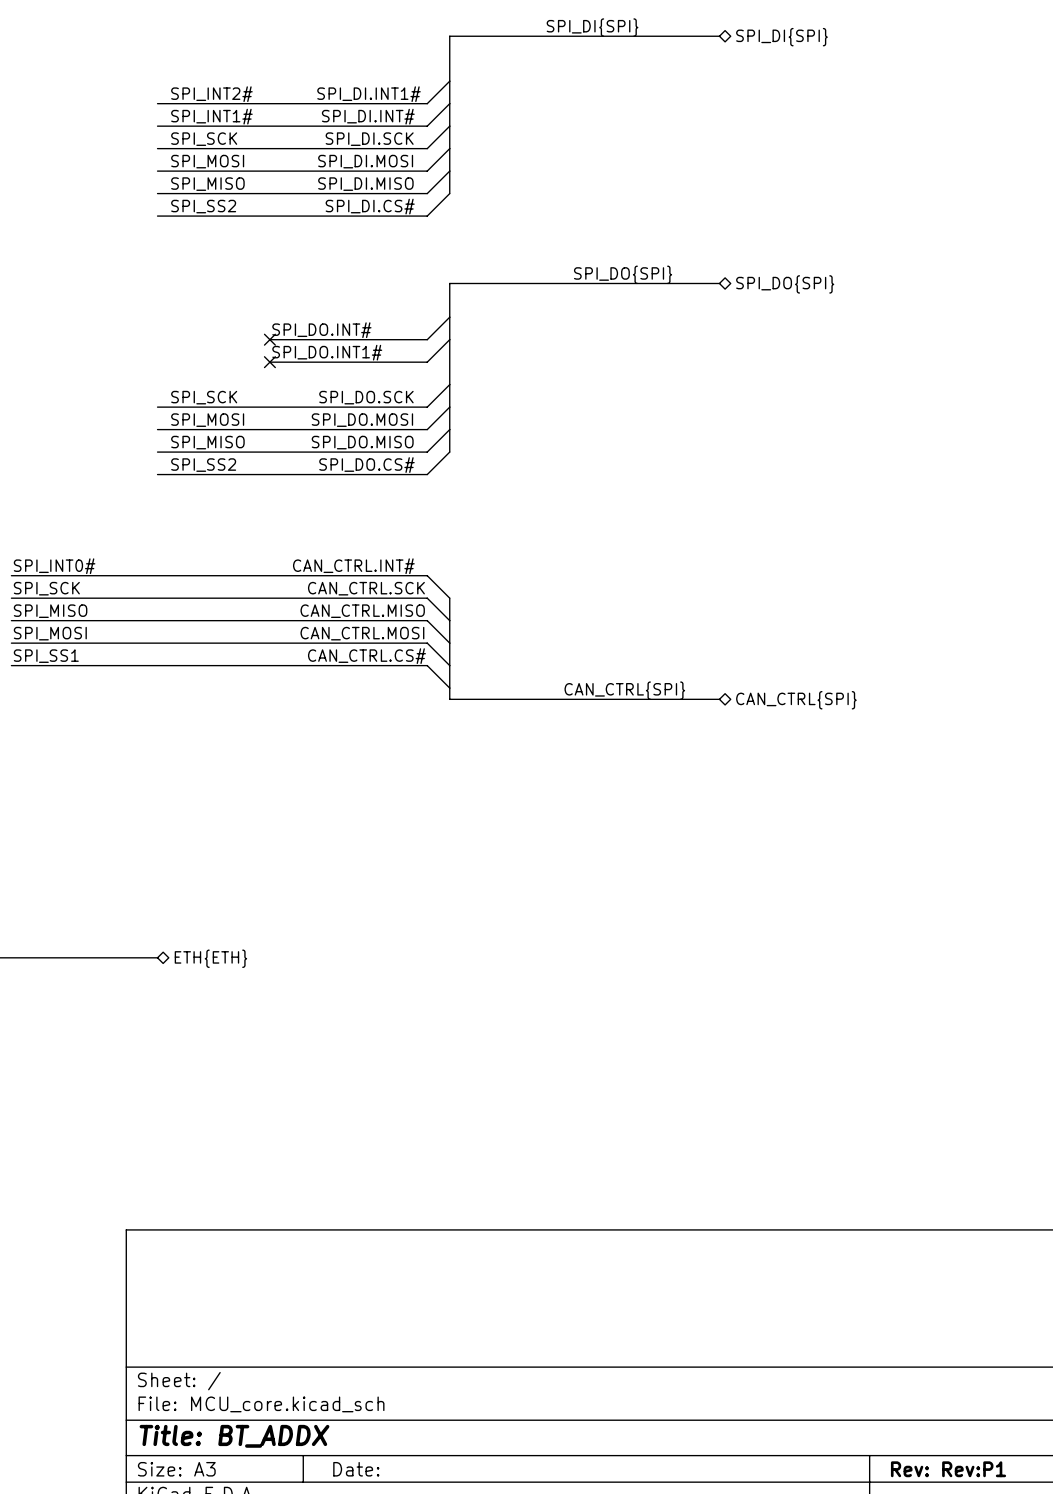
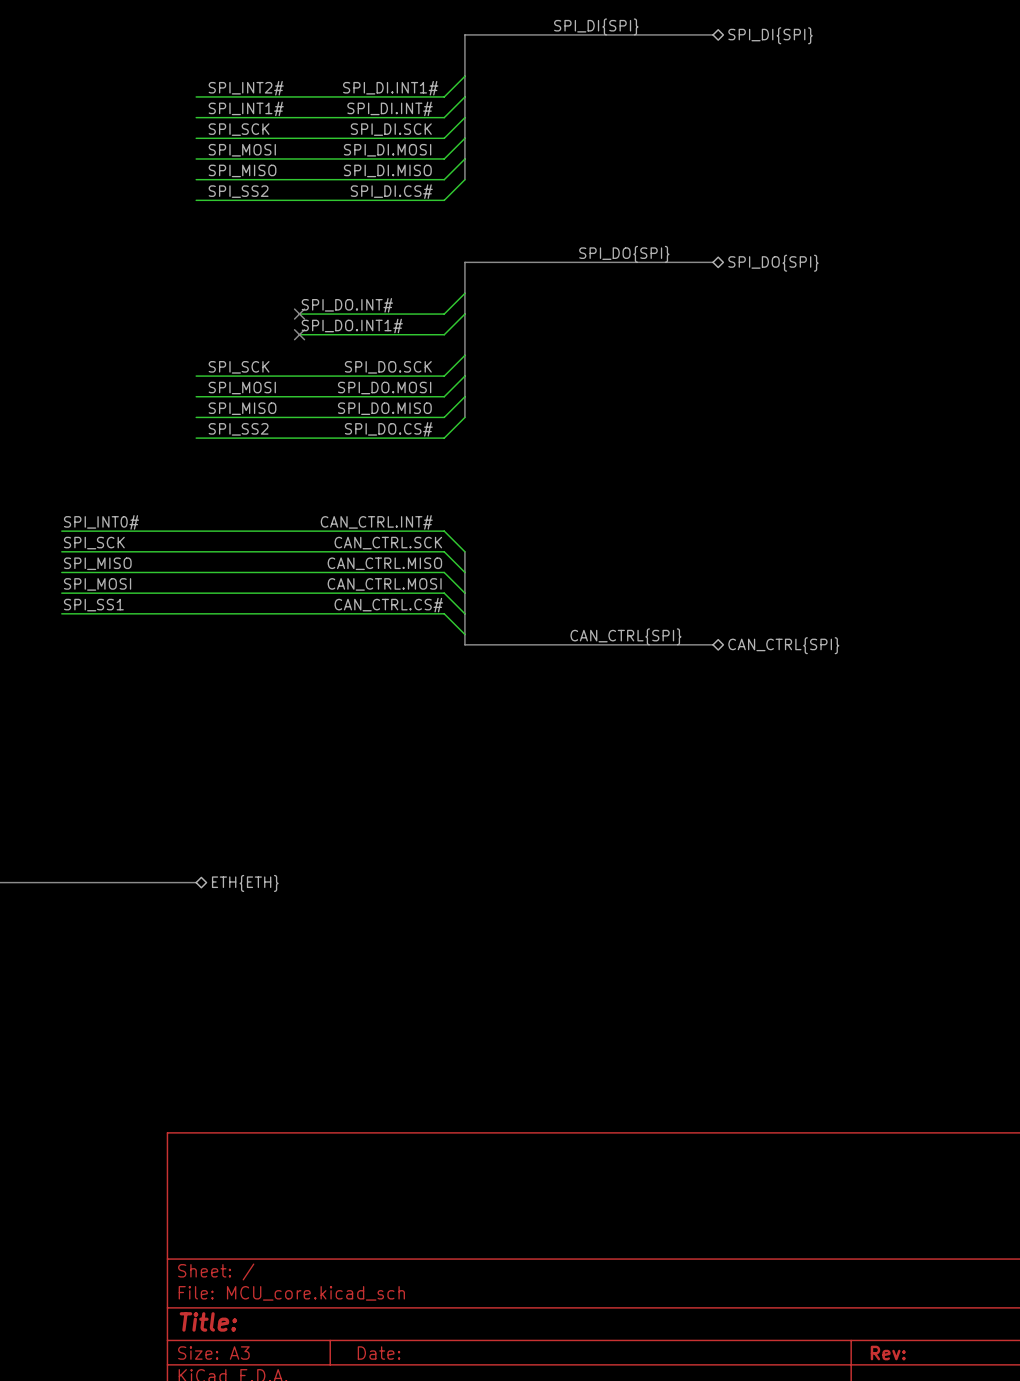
title block: Title: BT_ADDX (234, 1436) -> Title: (208, 1321)
title block: Rev: Rev:P1 (948, 1469) -> Rev: (888, 1353)

